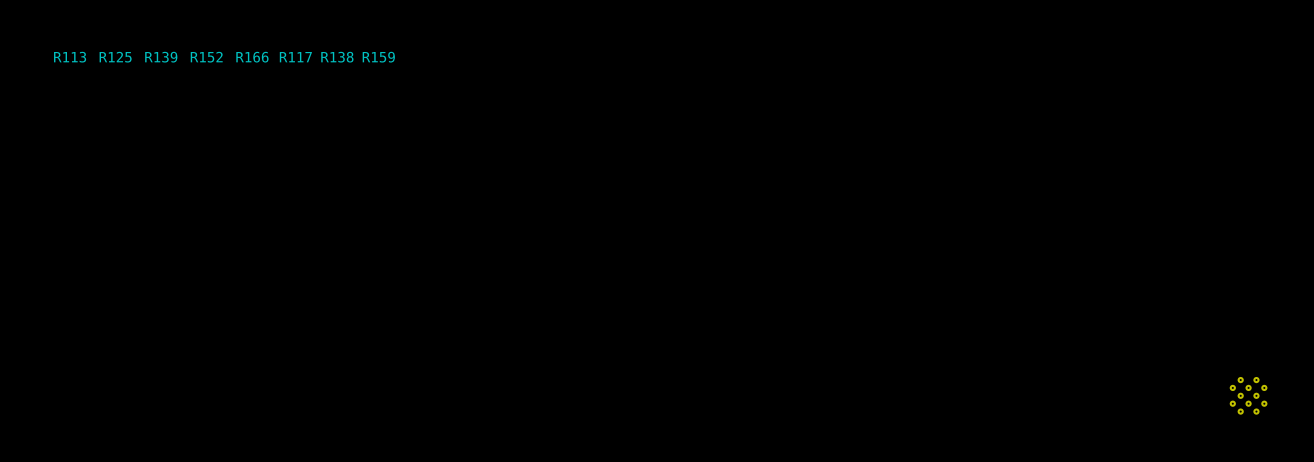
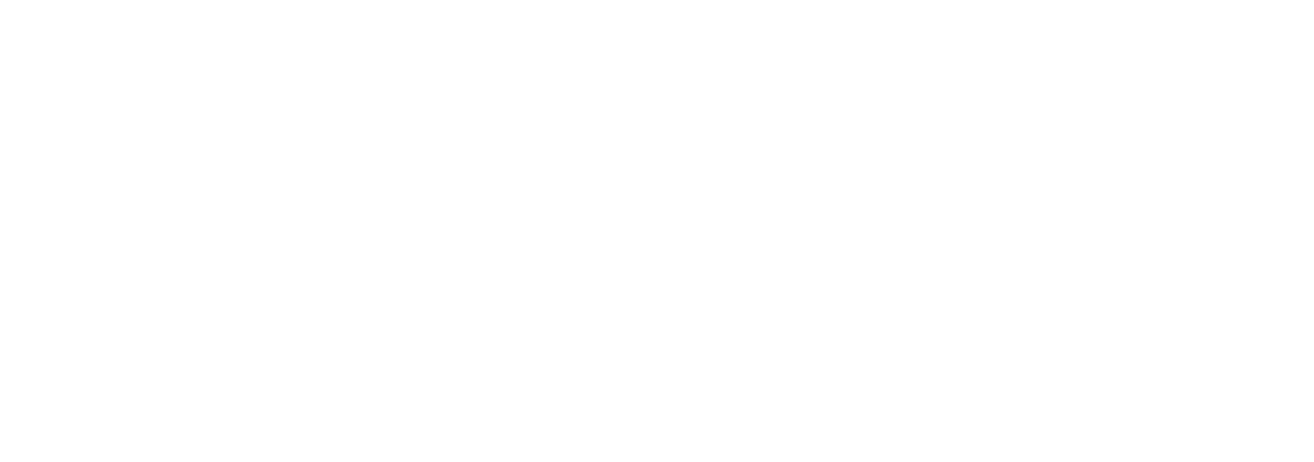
R113: (70, 57) -> none
R125: (115, 57) -> none
R139: (161, 57) -> none
R152: (206, 57) -> none
R166: (252, 57) -> none
R117: (295, 57) -> none
R138: (337, 57) -> none
R159: (378, 57) -> none
part: (1248, 395) -> none

